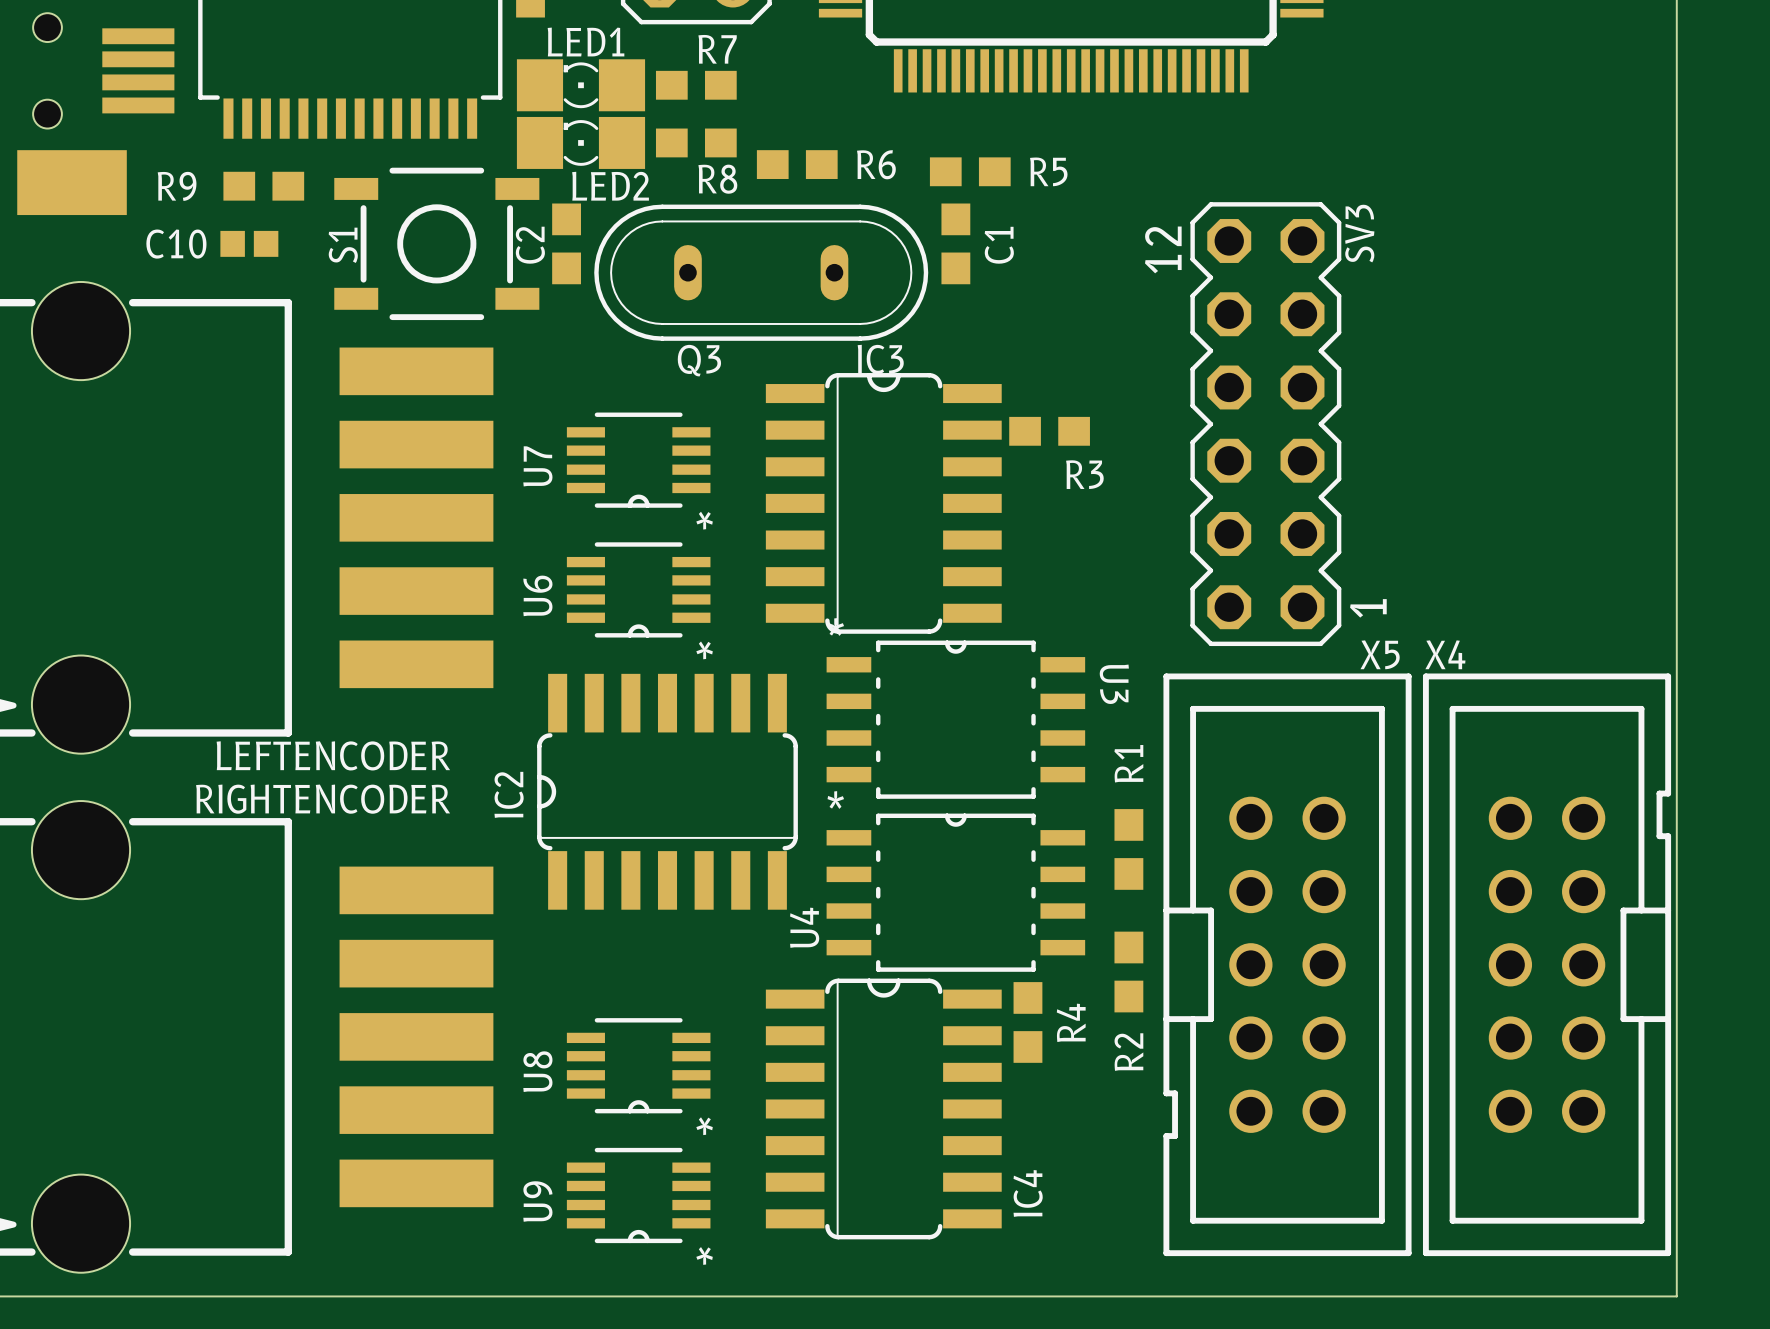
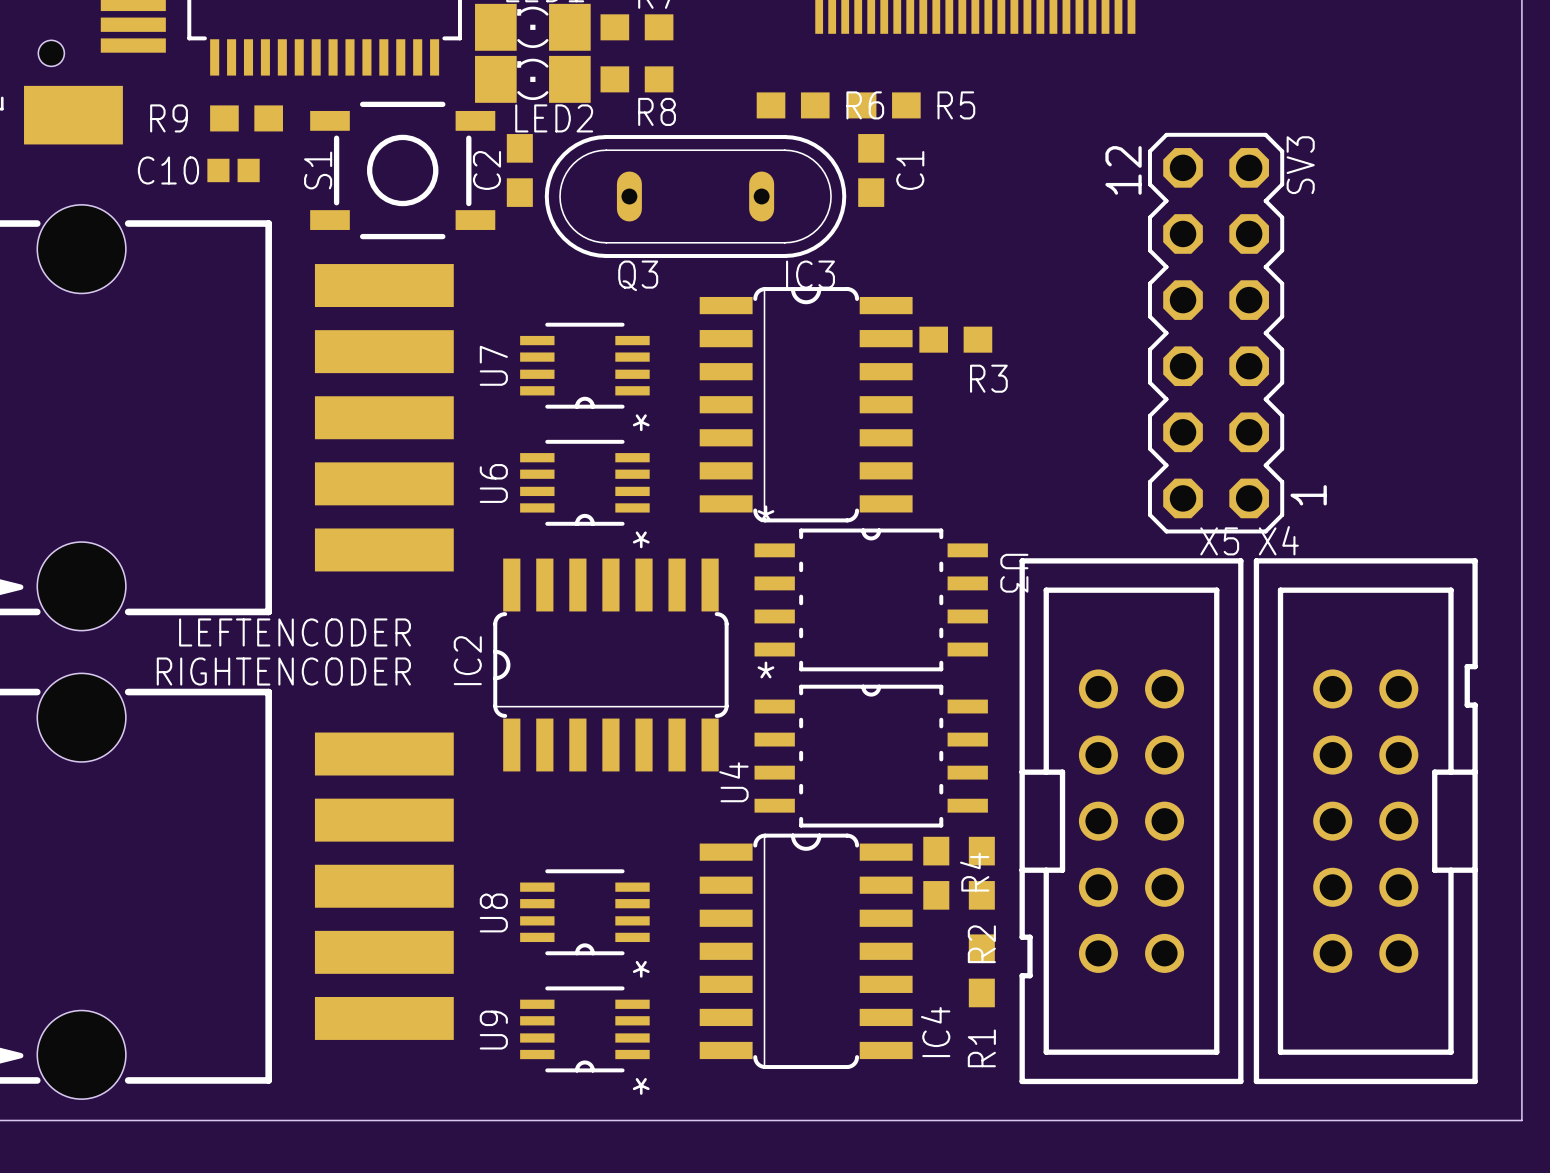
R6 position: (797, 164) -> (793, 105)
SV3 position: (1265, 424) -> (1216, 333)
R1 name position: R1 (1128, 763) -> R1 (981, 1048)
R1 position: (1128, 849) -> (981, 970)
X5 position: (1287, 964) -> (1131, 821)
X4 position: (1547, 964) -> (1365, 821)
R2 position: (1128, 972) -> (981, 873)

